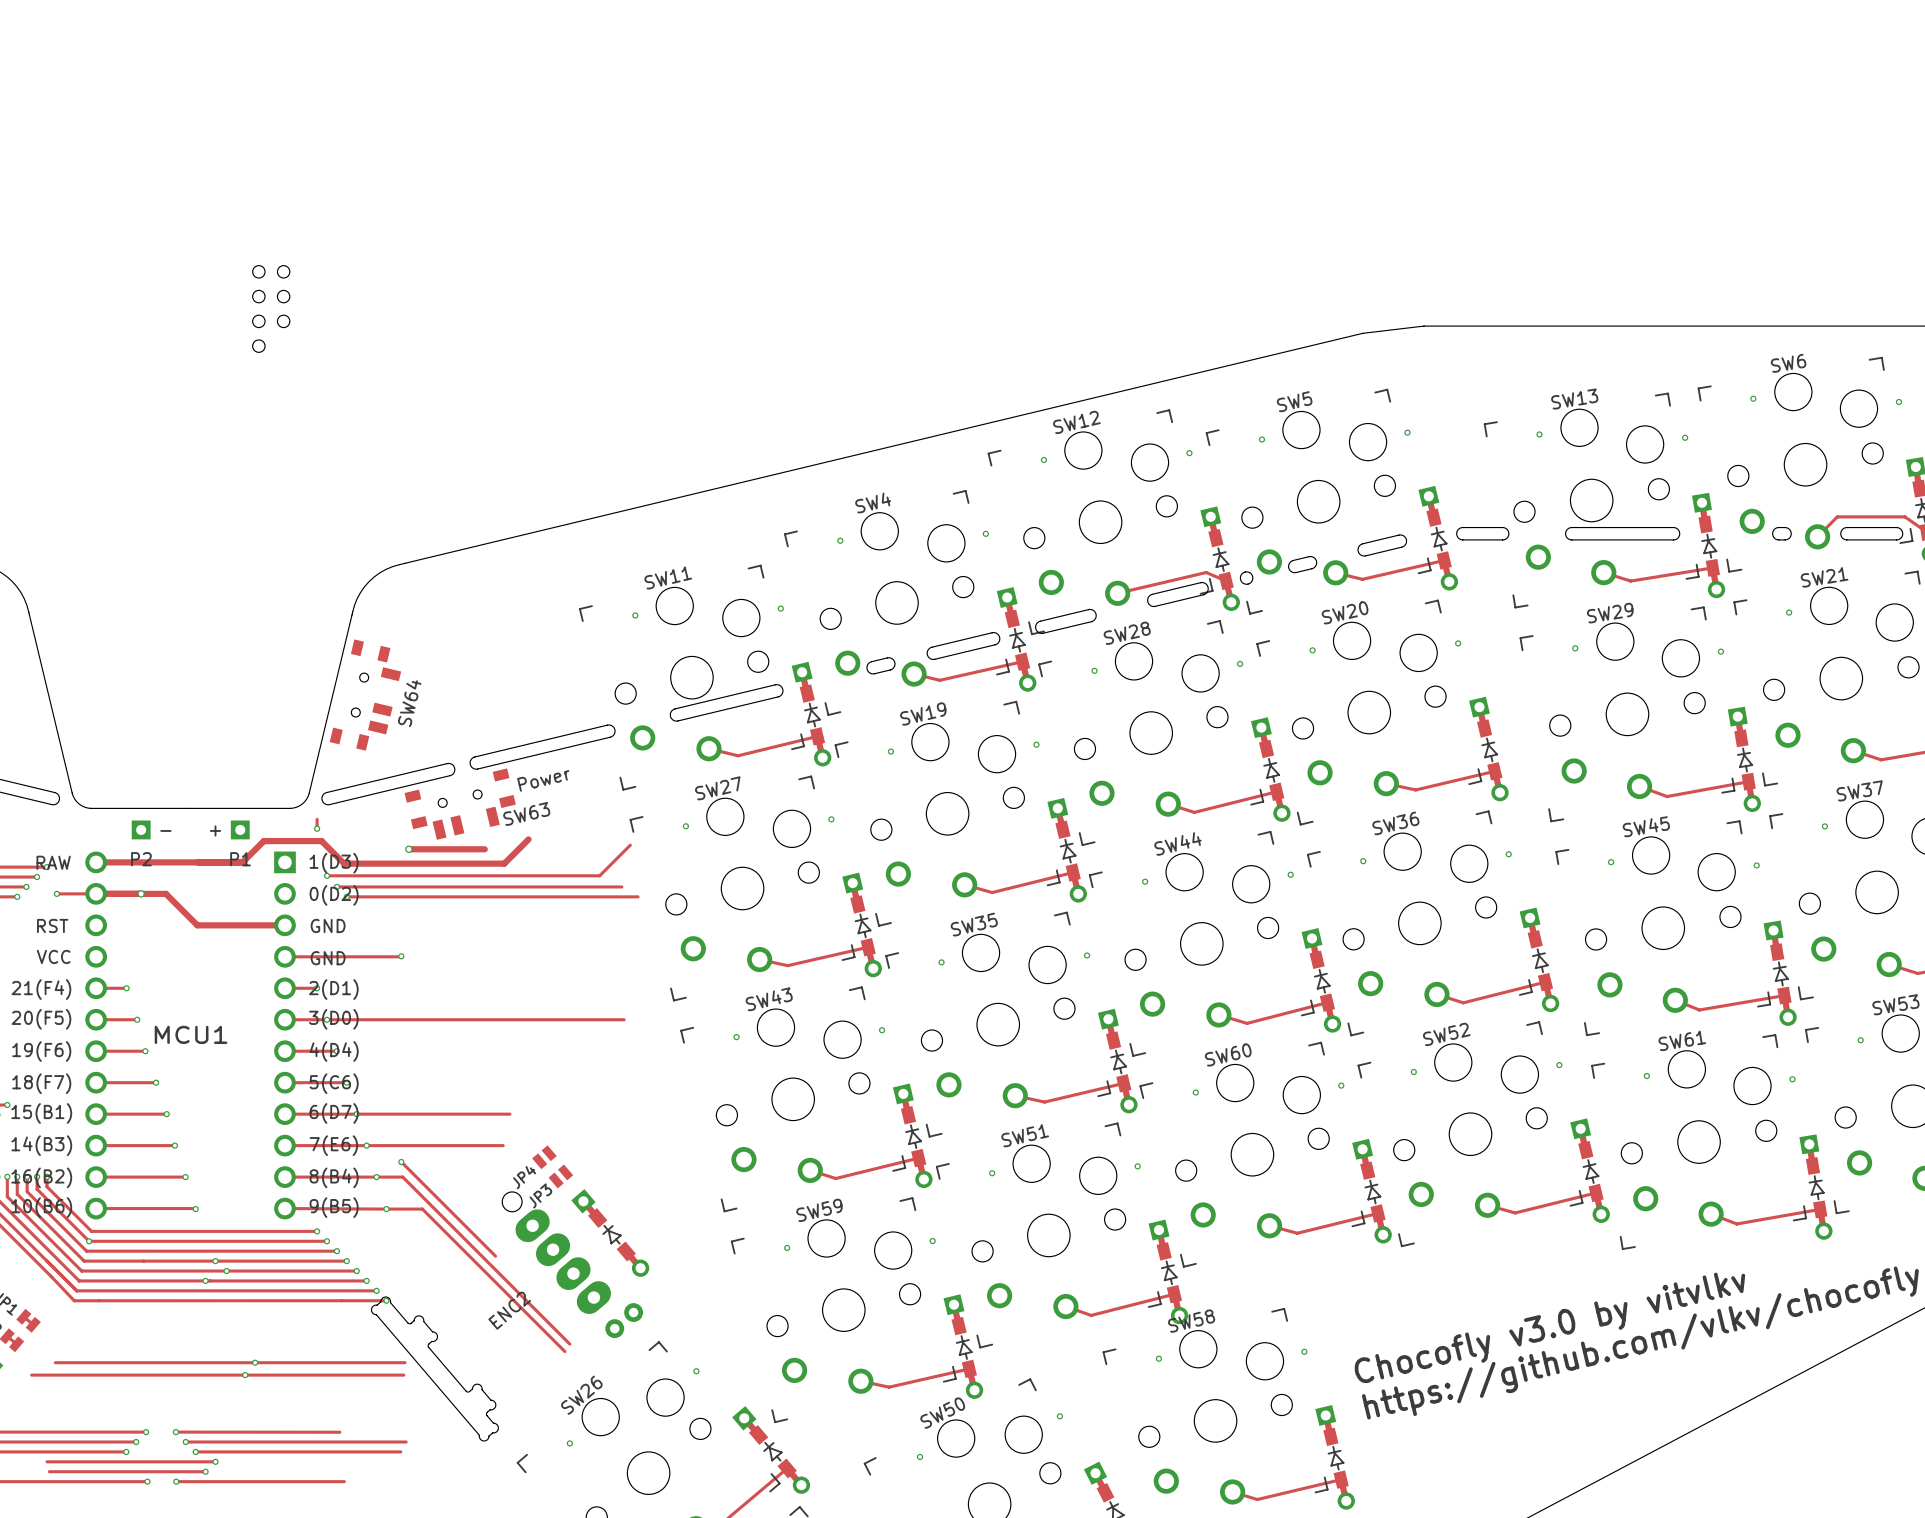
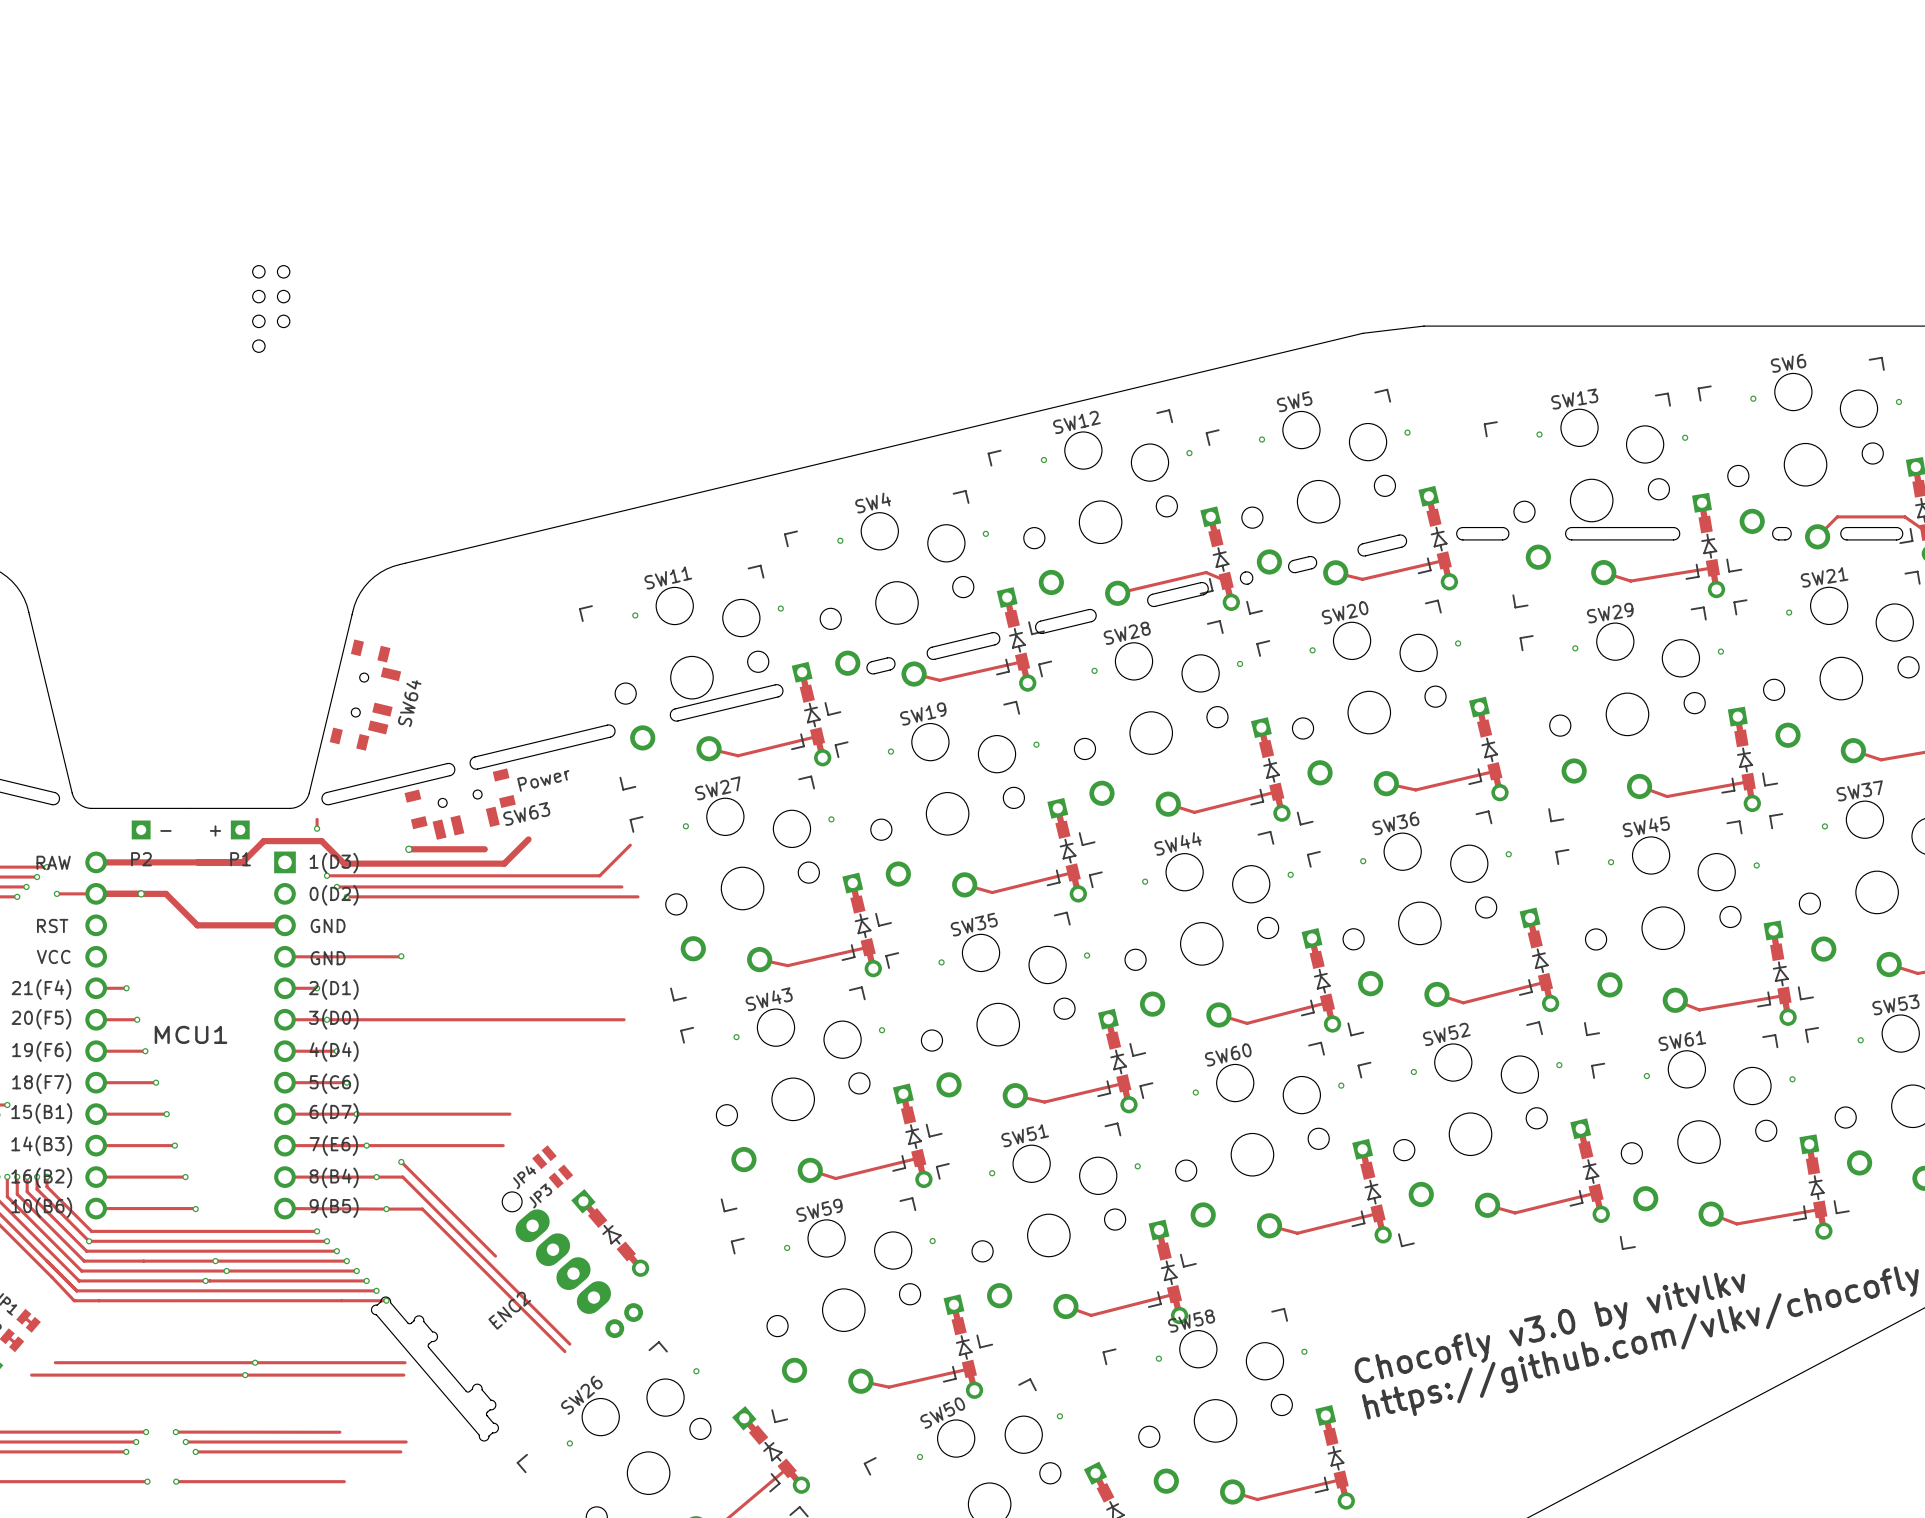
track: (47, 1461) (215, 1461) -> none
via: (215, 1461) -> none
track: (49, 1471) (205, 1471) -> none
via: (205, 1471) -> none

